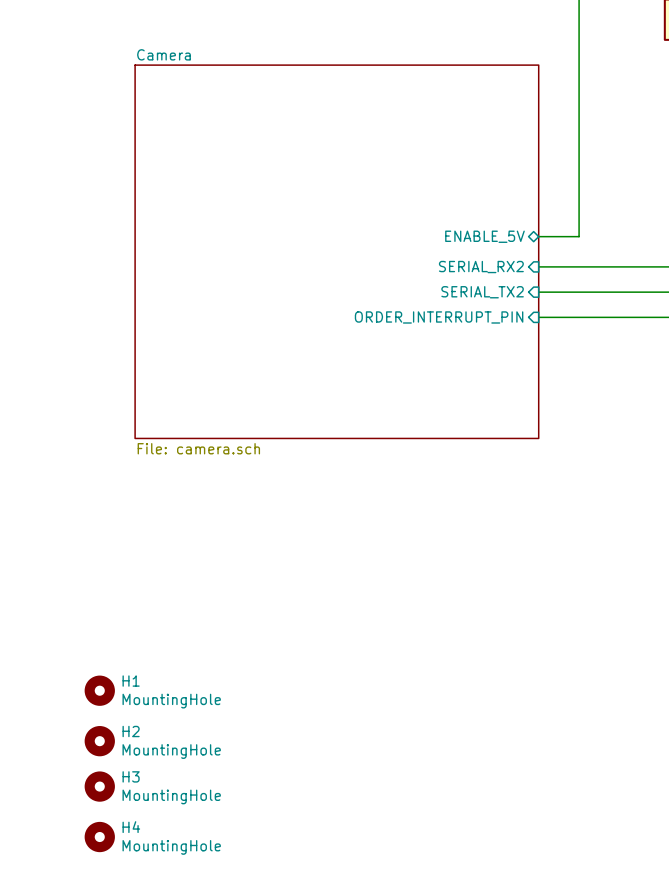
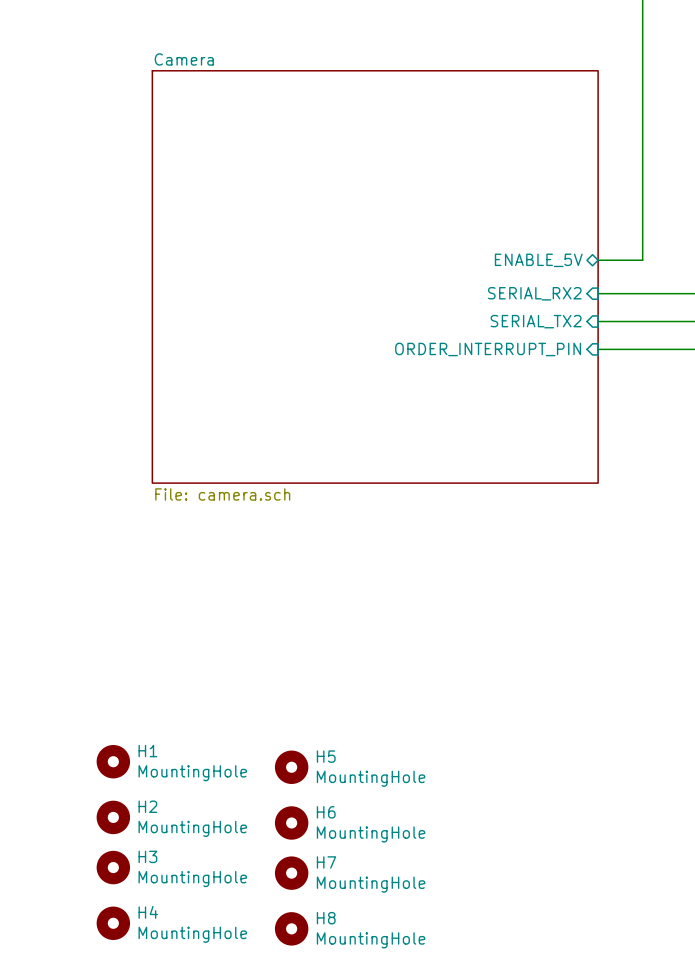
H5: none -> MountingHole (291, 767)
H6: none -> MountingHole (291, 822)
H7: none -> MountingHole (291, 873)
H8: none -> MountingHole (291, 928)

